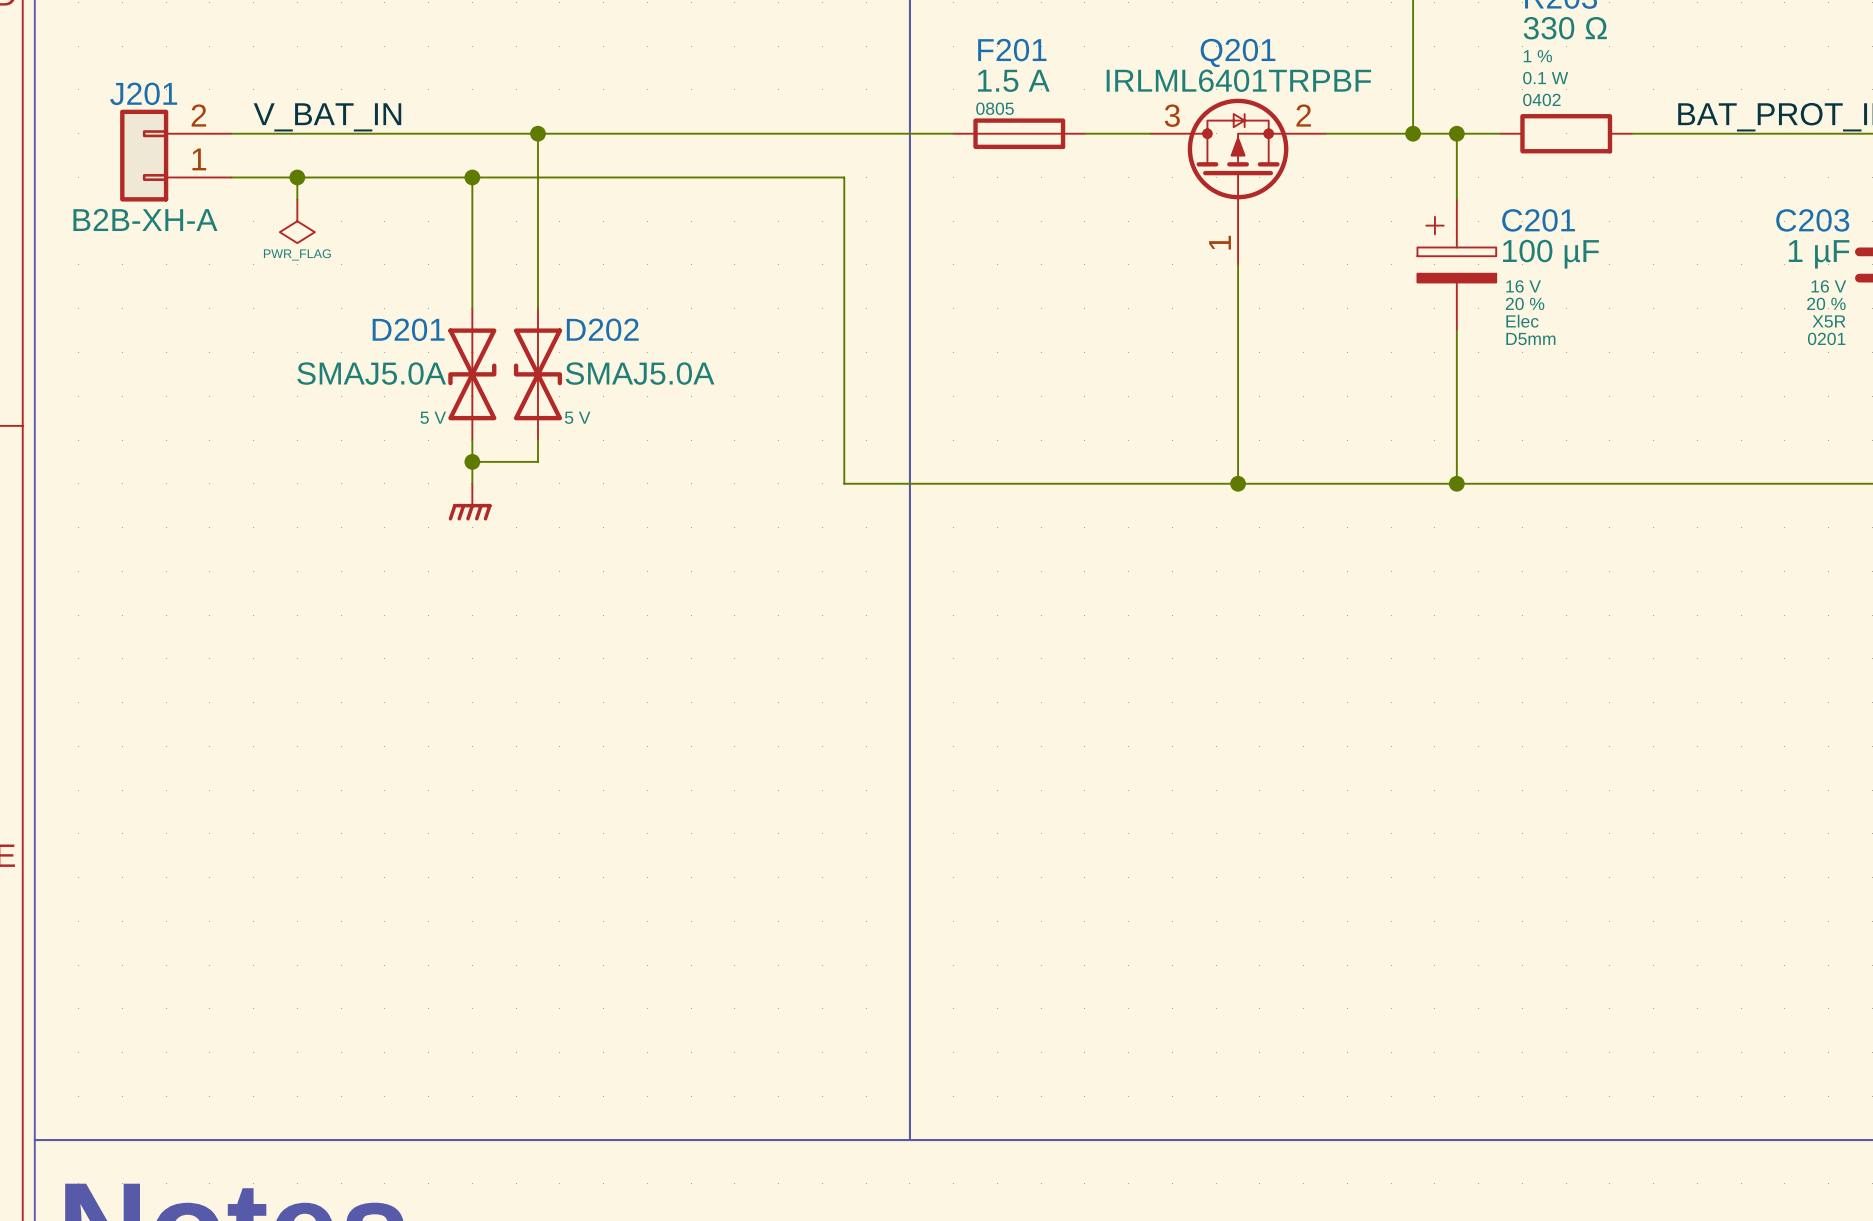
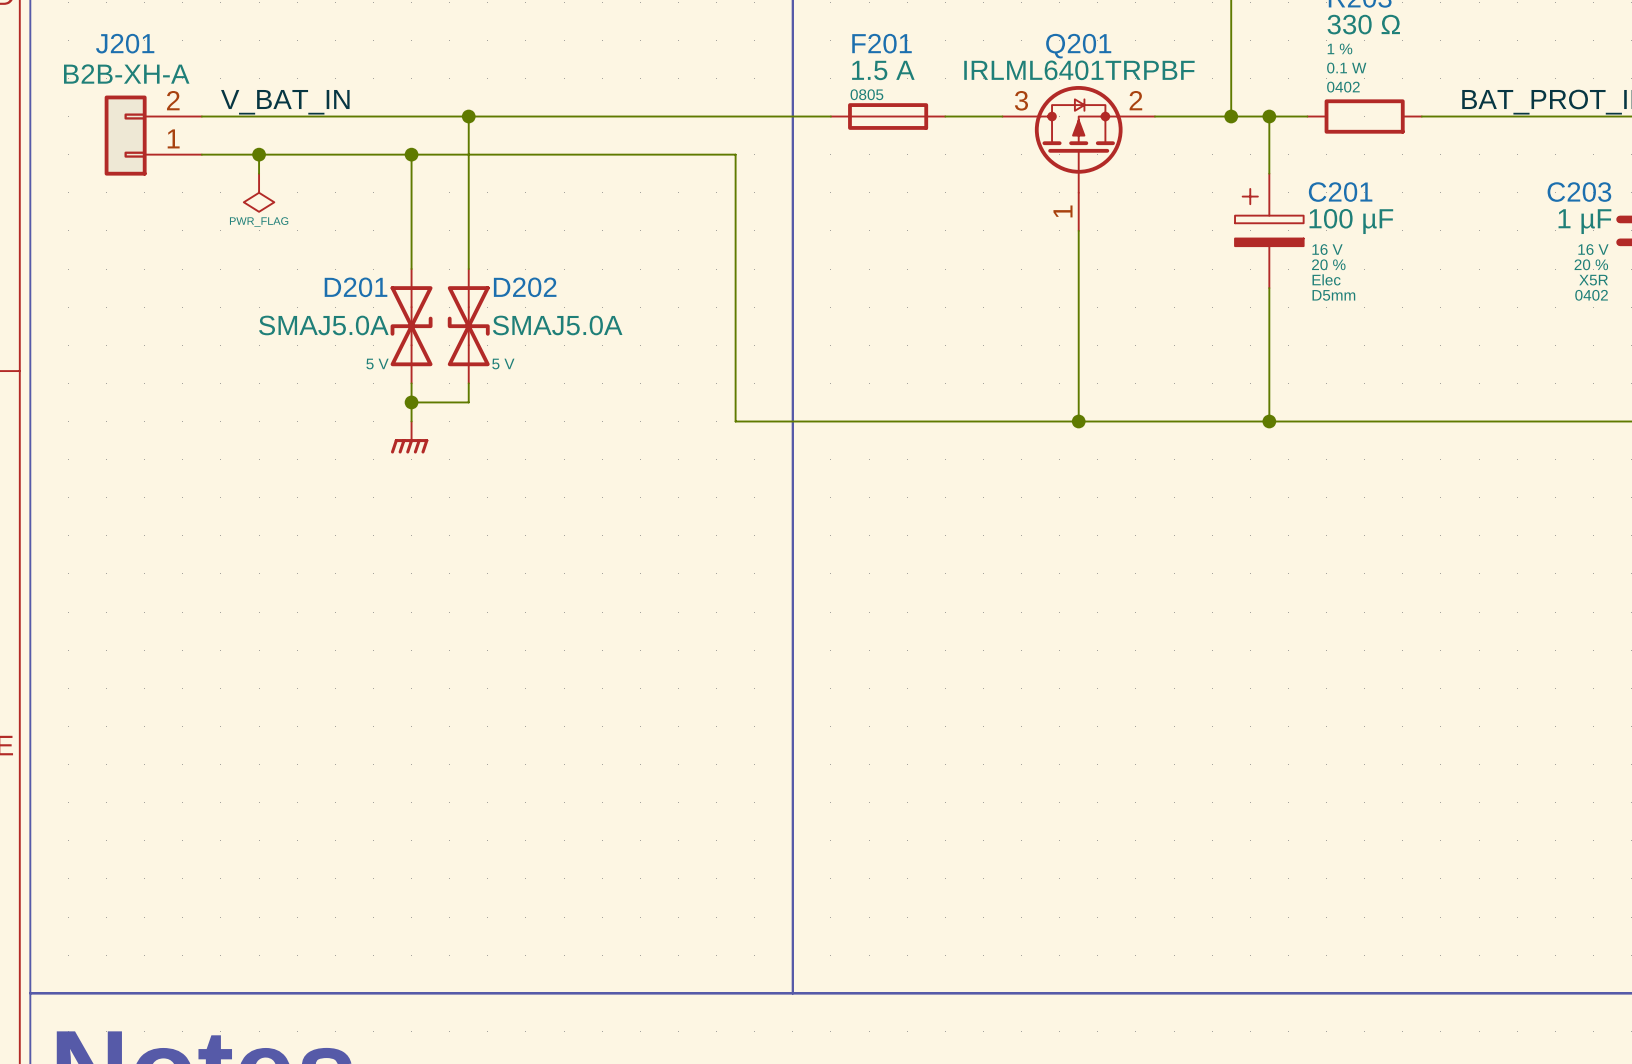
J201 name position: J201 (143, 93) -> J201 (125, 43)
J201 value position: B2B-XH-A (145, 219) -> B2B-XH-A (126, 74)
C203 text: 0201 (1826, 338) -> 0402 (1591, 295)

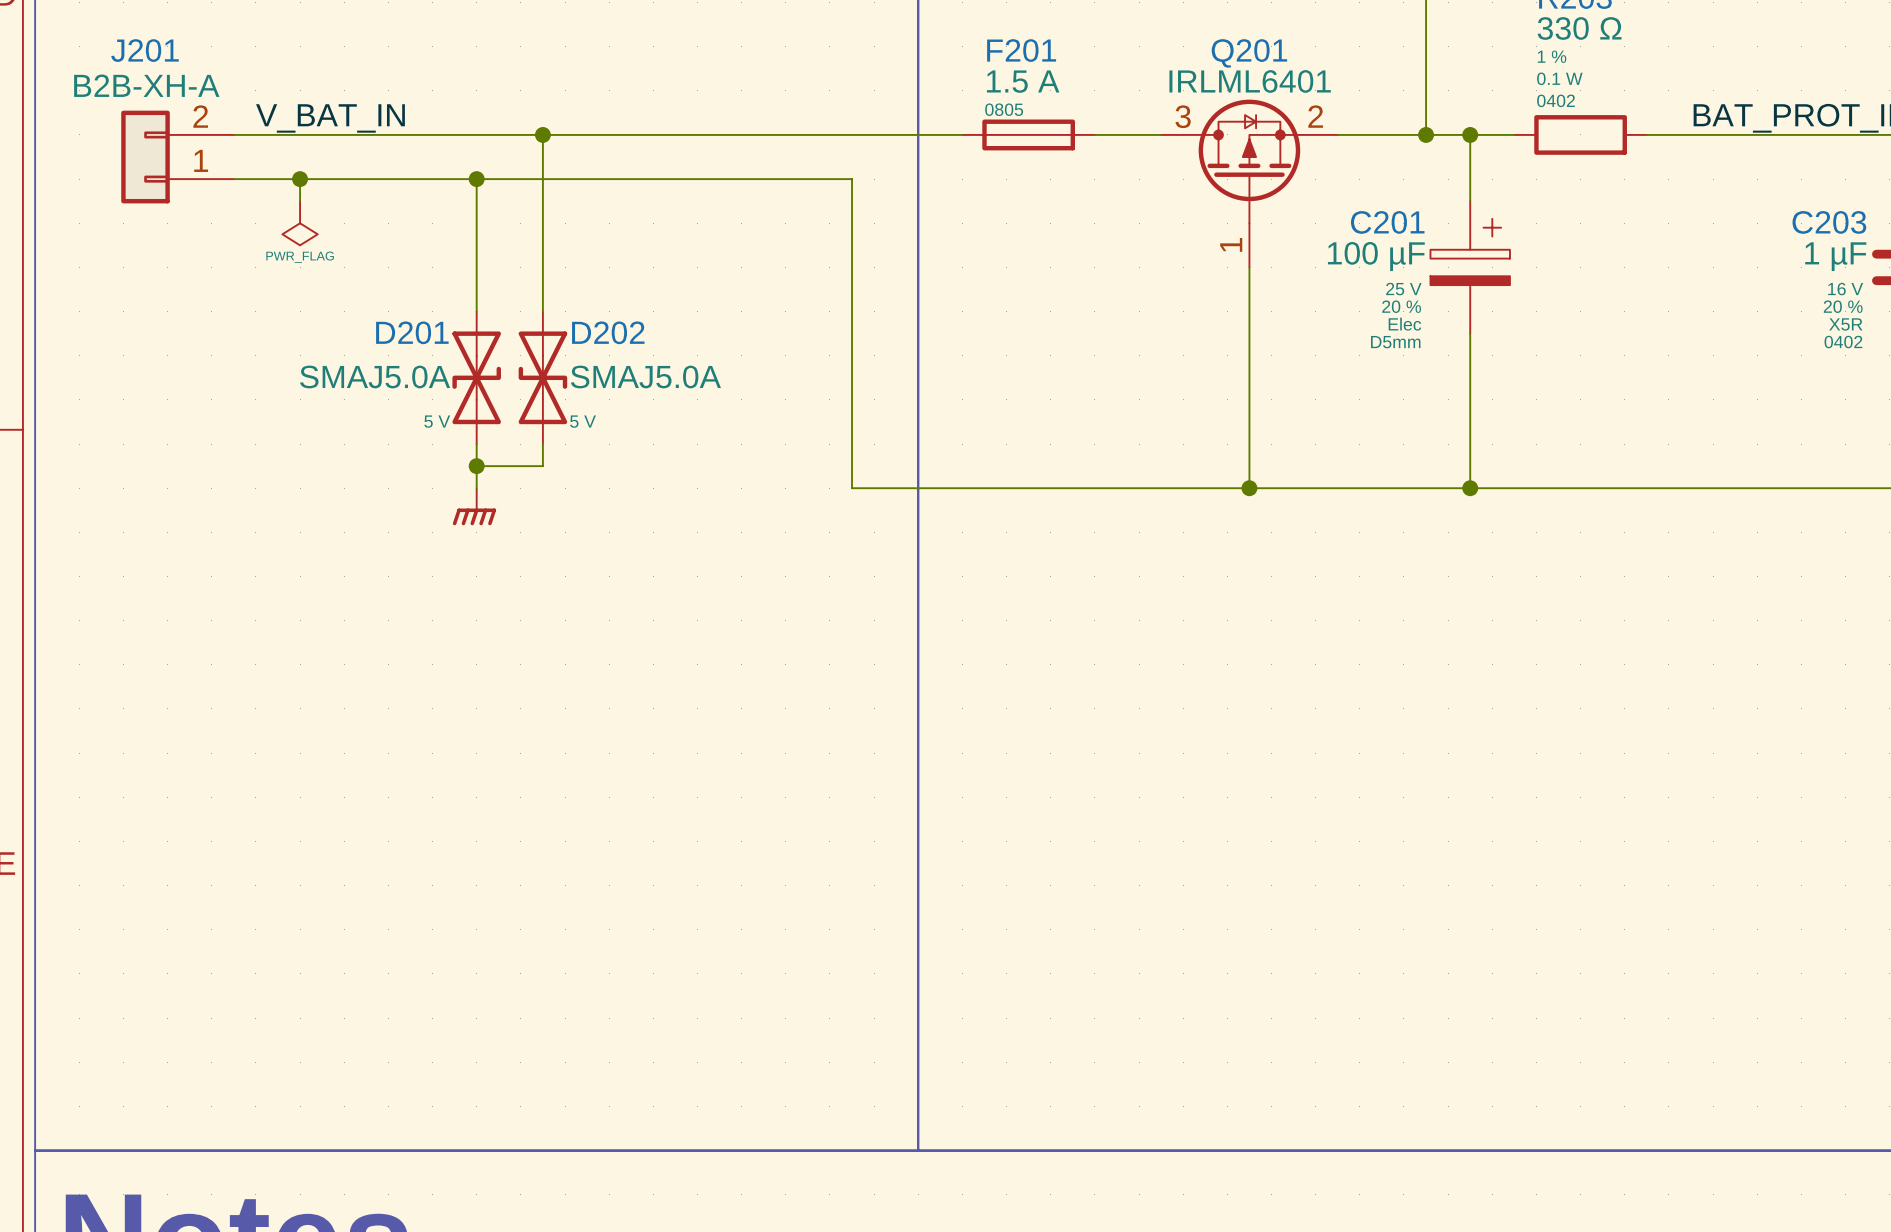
Q201 value: IRLML6401TRPBF (1079, 70) -> IRLML6401 (1250, 81)
C201 flip: as is (1269, 217) -> left-right (1470, 251)
C201 text: 16 V (1327, 249) -> 25 V (1403, 289)

